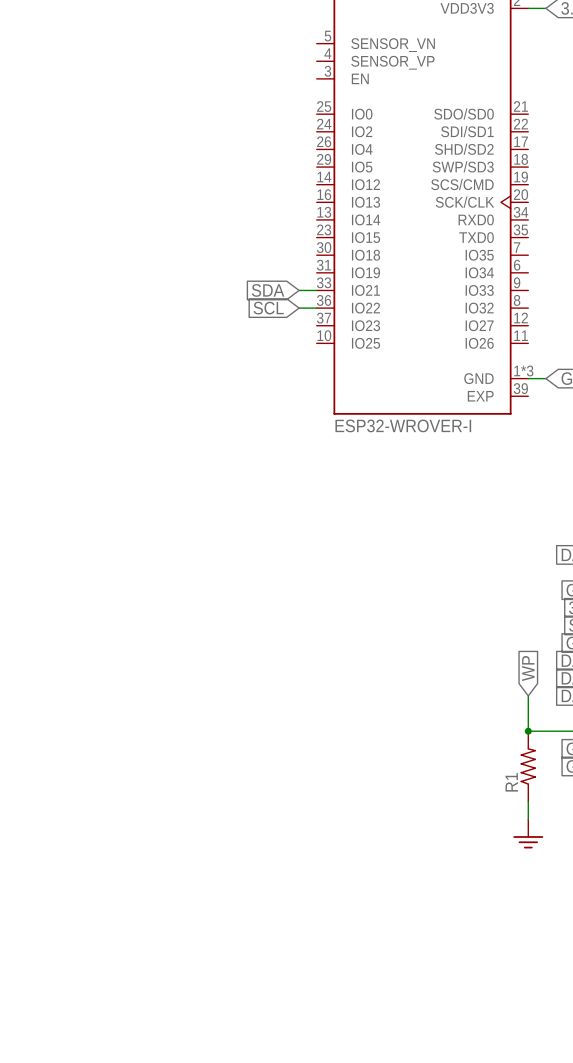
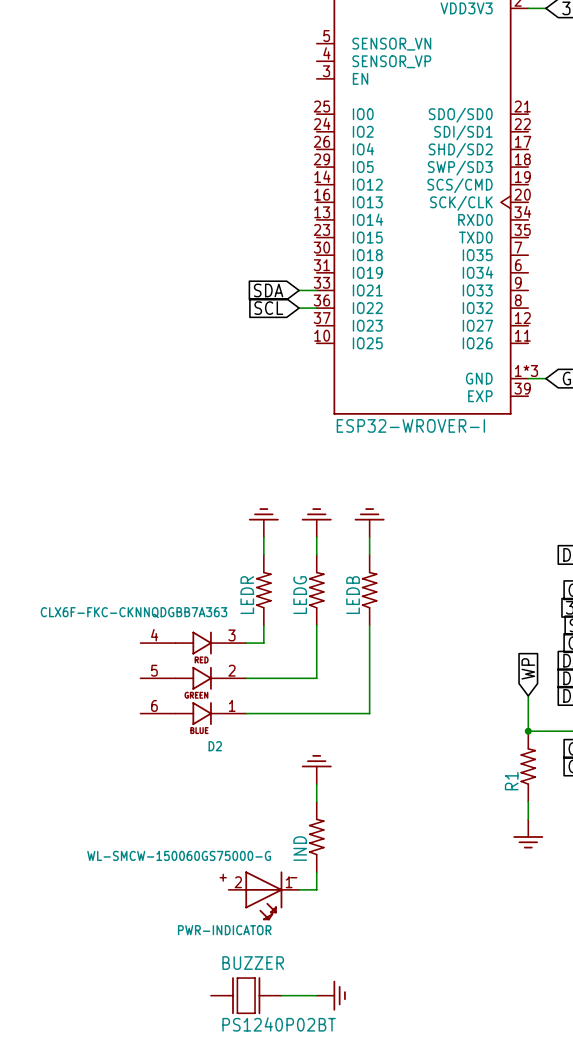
power symbol: none -> (263, 522)
power symbol: none -> (316, 522)
power symbol: none -> (369, 522)
wire: none -> (263, 537) (263, 554)
wire: none -> (316, 537) (316, 554)
wire: none -> (369, 537) (369, 554)
LEDR: none -> (263, 590)
LEDG: none -> (316, 590)
LEDB: none -> (369, 590)
wire: none -> (263, 625) (263, 643) (246, 643)
wire: none -> (316, 625) (316, 678) (246, 678)
wire: none -> (369, 625) (369, 713) (246, 713)
D2: none -> CLX6F-FKC-CKNNQDGBB7A363 (193, 678)
power symbol: none -> (316, 769)
wire: none -> (316, 784) (316, 801)
IND: none -> (316, 836)
wire: none -> (316, 872) (316, 889) (299, 889)
PWR-INDICATOR: none -> WL-SMCW-150060GS75000-G (263, 895)
BUZZER: none -> PS1240P02BT (246, 995)
wire: none -> (281, 995) (316, 995)
power symbol: none -> (331, 995)

